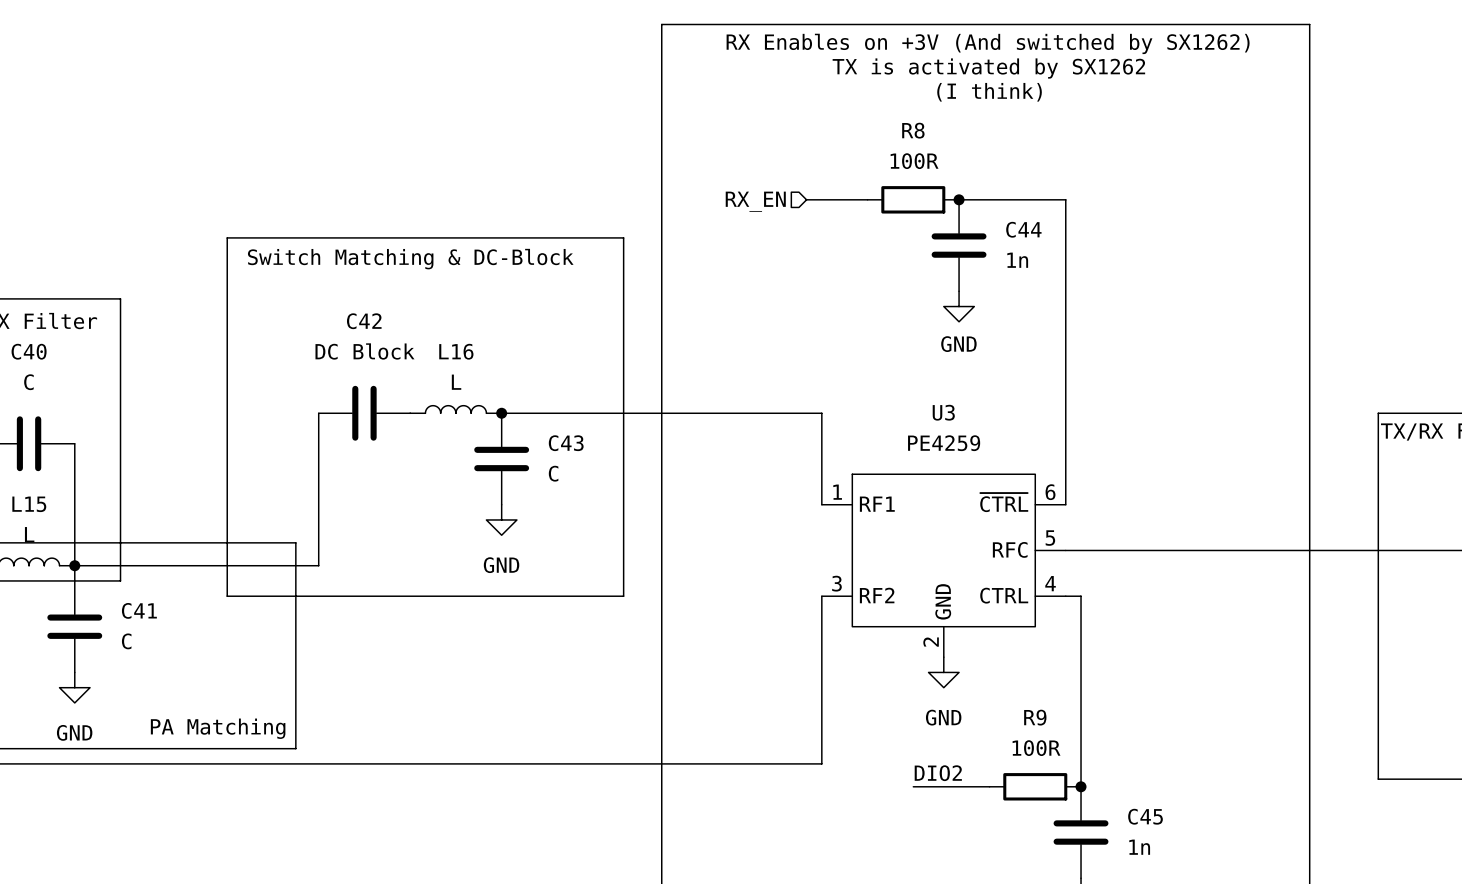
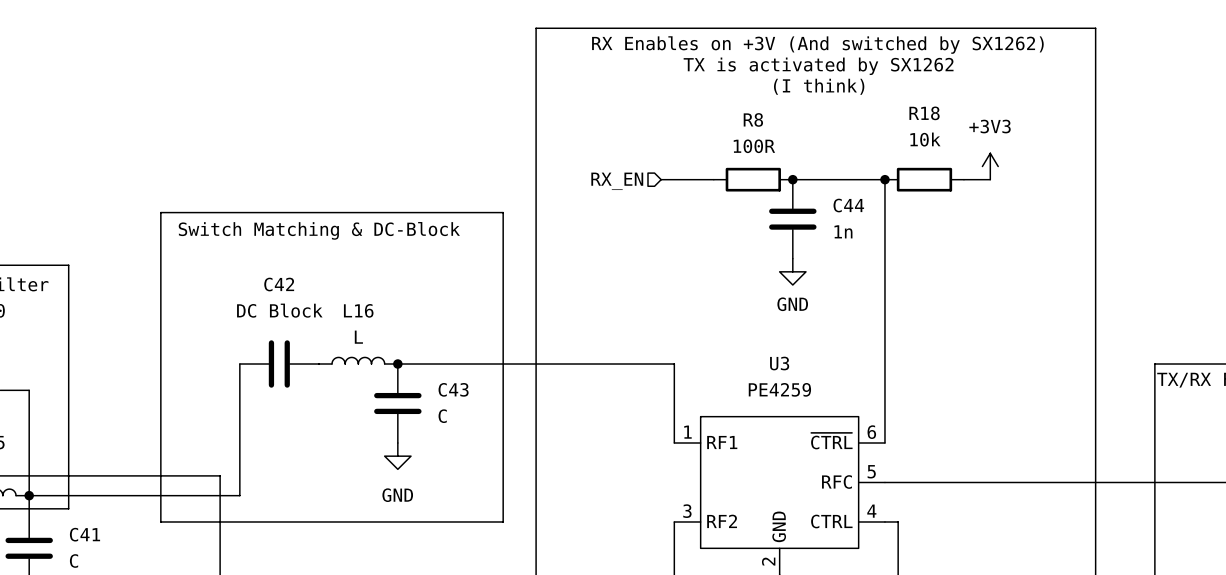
power symbol: none -> +3V3 (990, 166)
junction: none -> (884, 179)
R18: none -> 10k (924, 179)
wire: none -> (963, 179) (990, 179)

